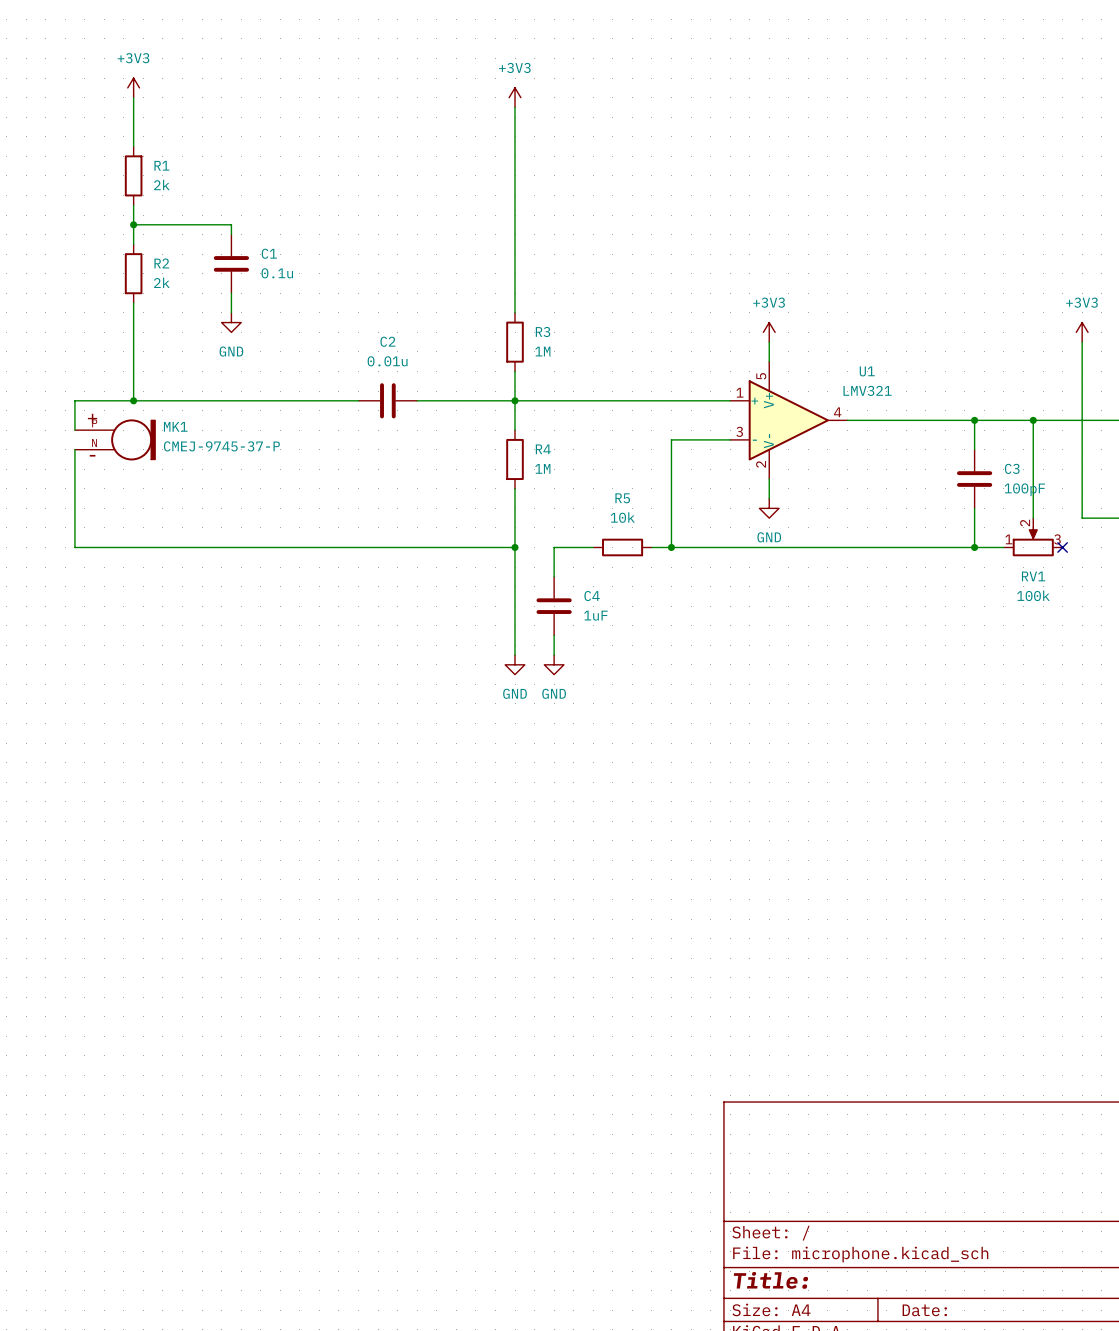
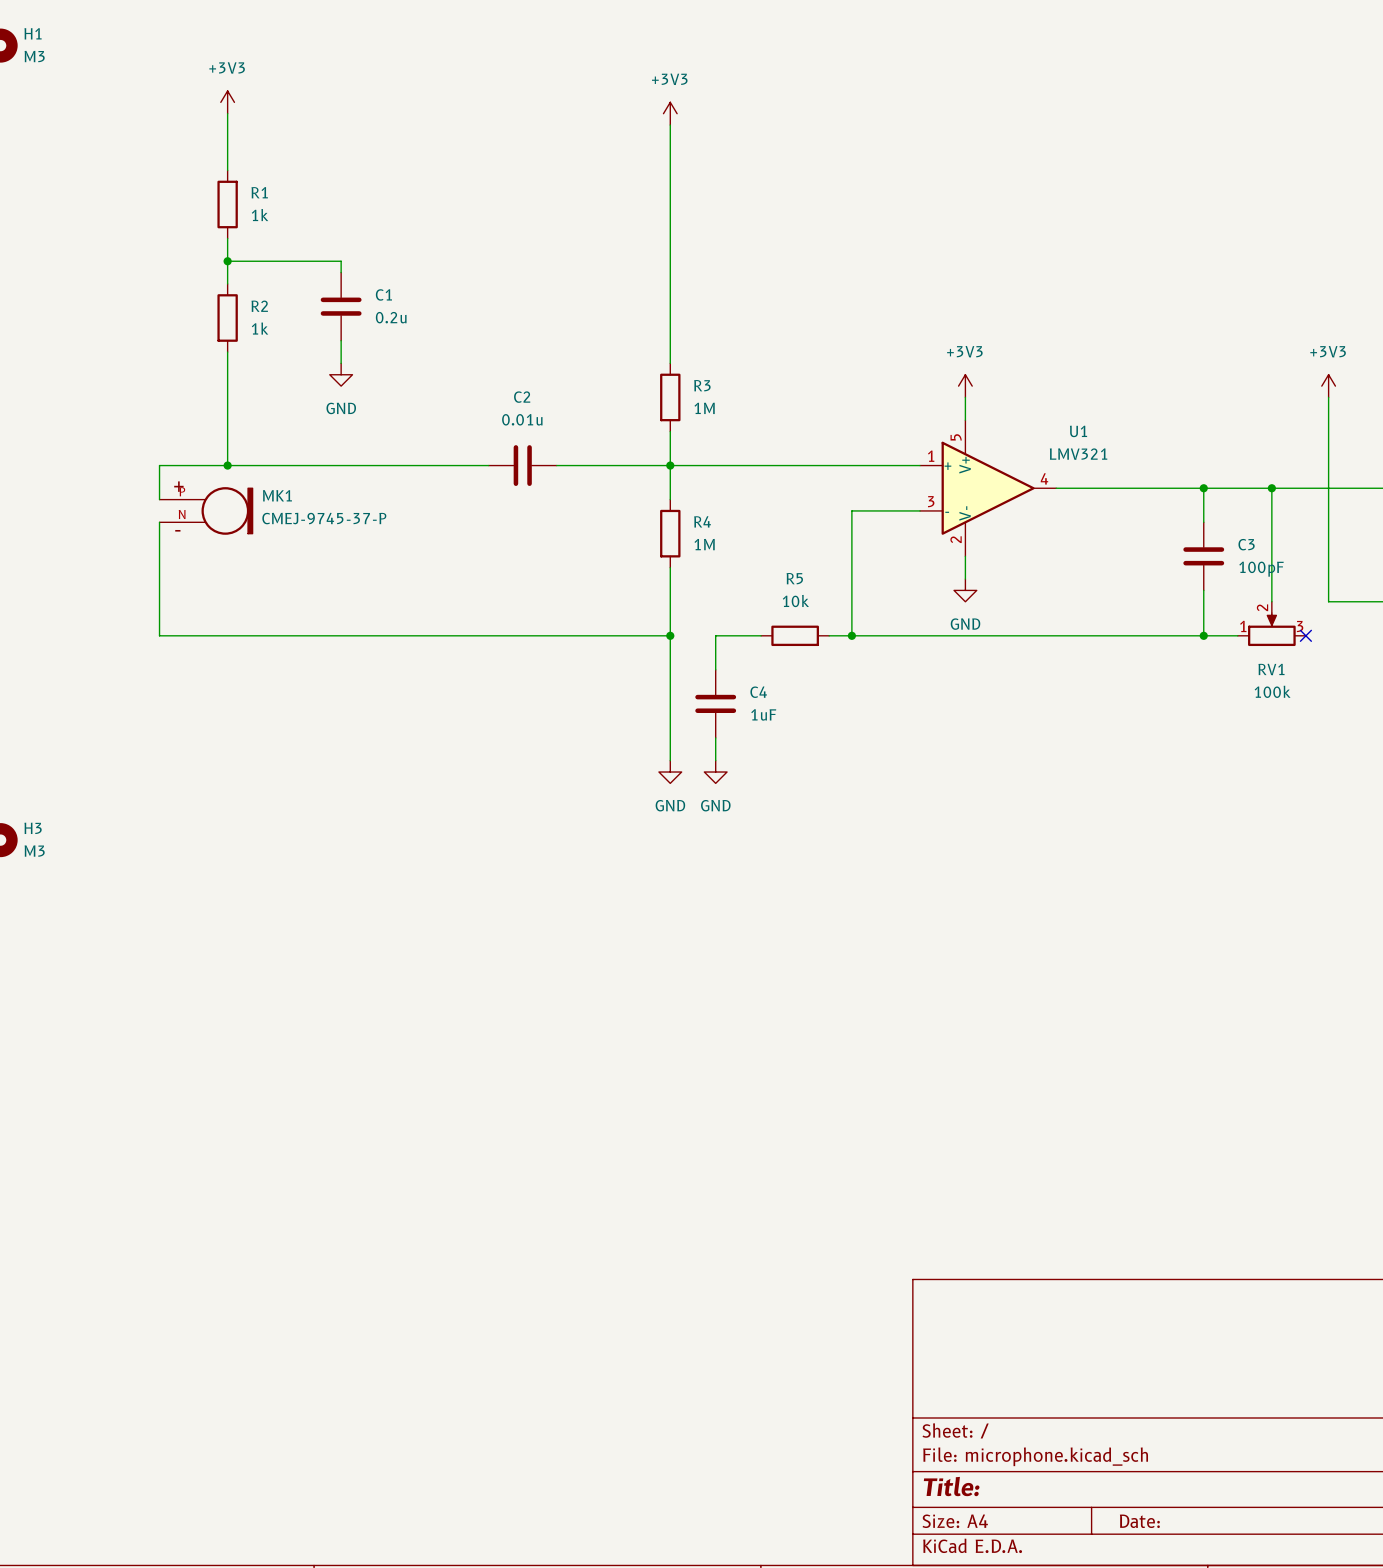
R1 value: 2k (161, 185) -> 1k (260, 215)
C1 value: 0.1u (277, 273) -> 0.2u (391, 317)
R2 value: 2k (161, 282) -> 1k (260, 328)

